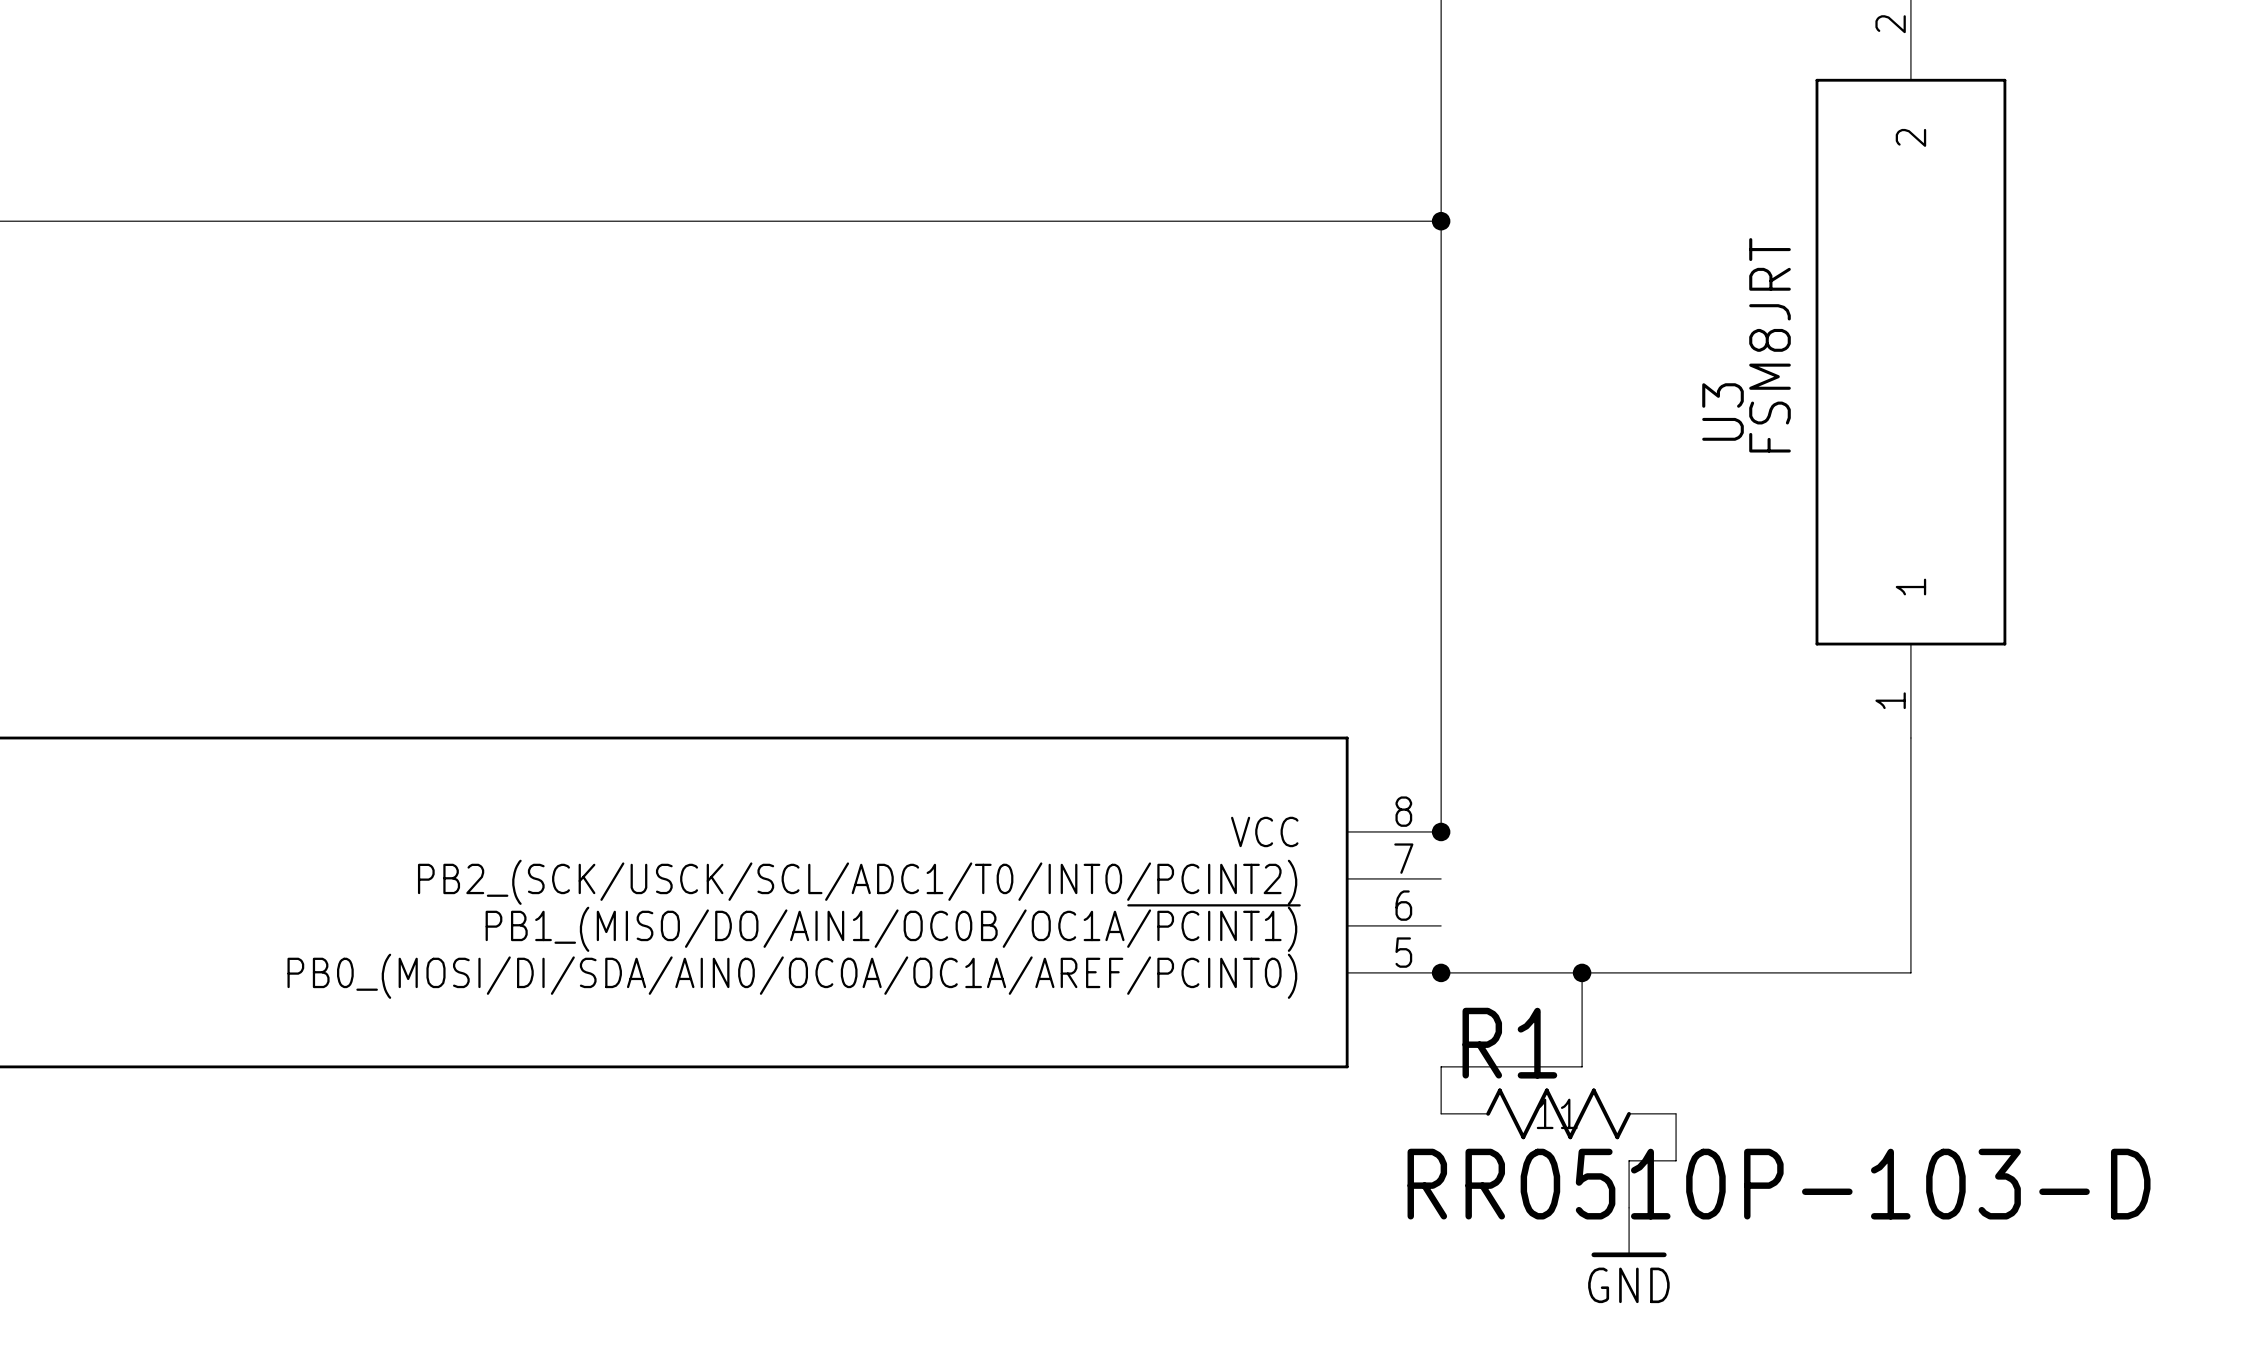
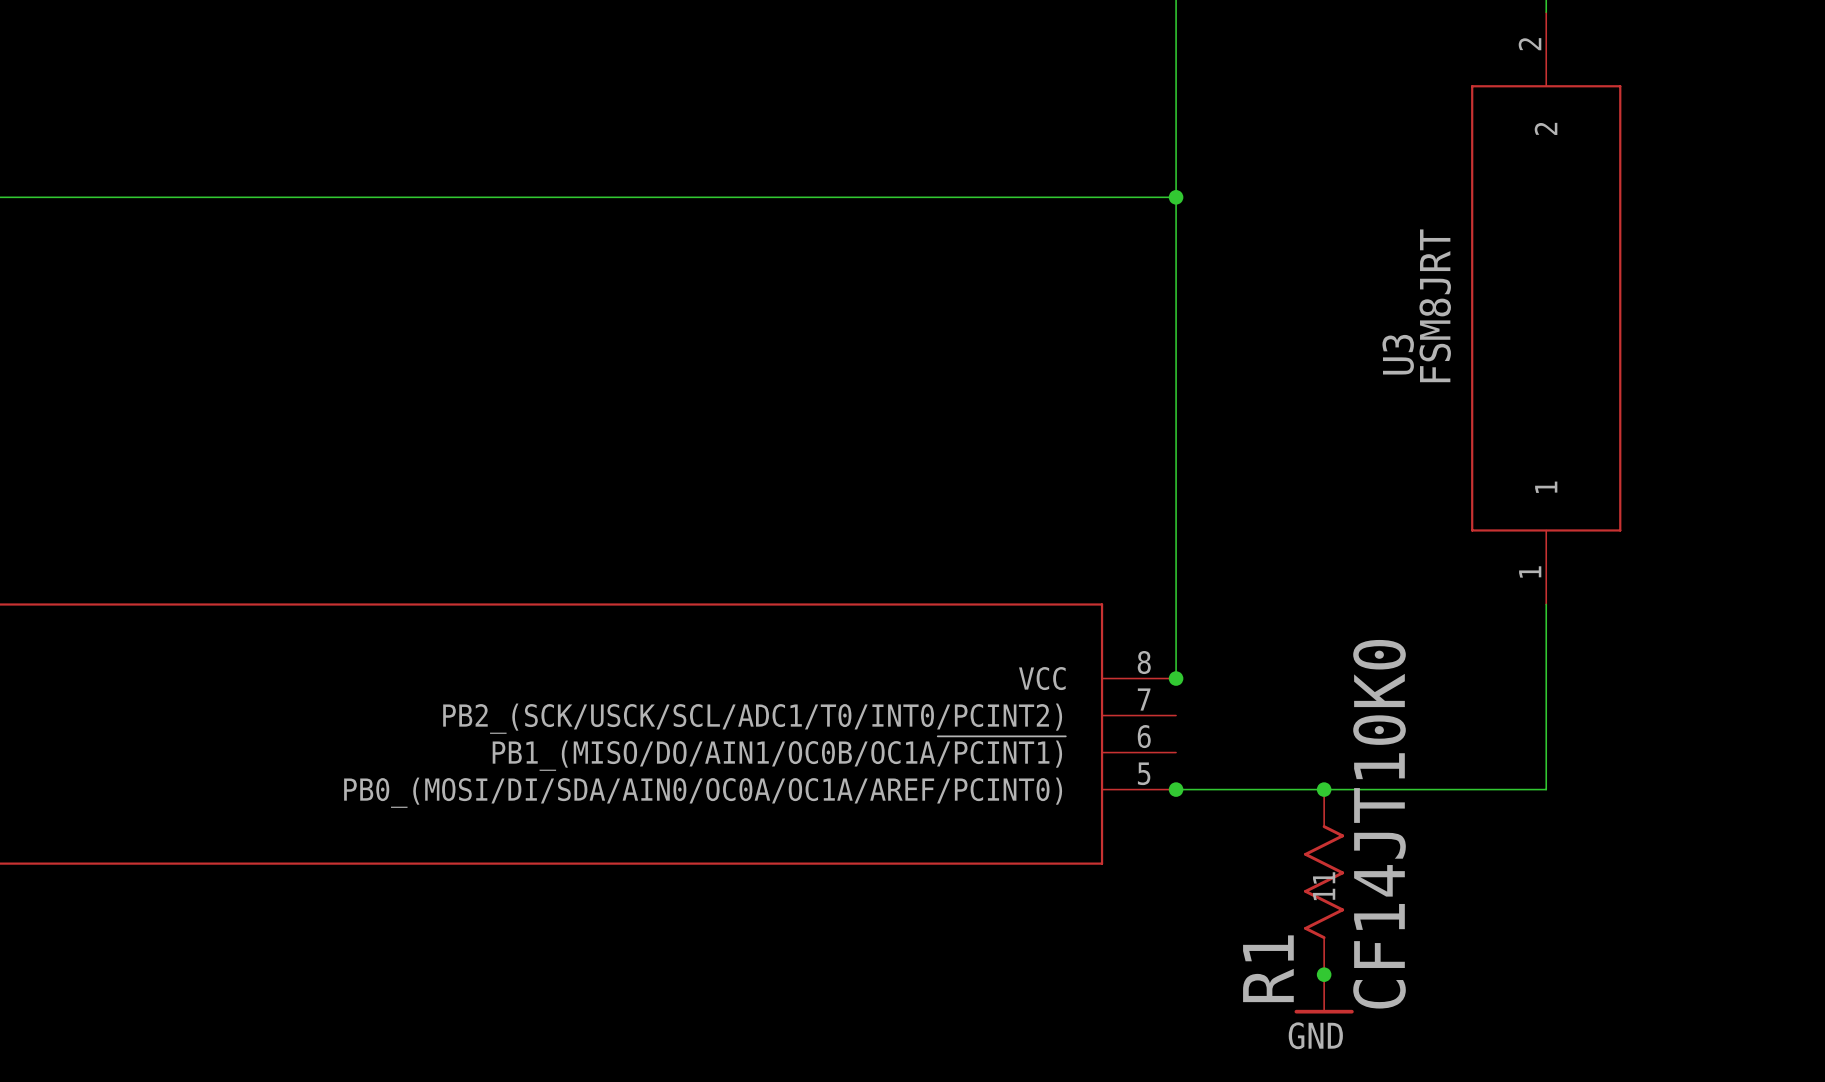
wire: (1582, 972) (1582, 1066) (1441, 1066) (1441, 1113) -> none
junction position: (1582, 972) -> (1324, 789)
R1 name position: R1 (1509, 1043) -> R1 (1268, 968)
R1 rotation: 0° (1558, 1113) -> 90° counterclockwise (1324, 882)
wire: (1676, 1113) (1676, 1160) (1629, 1160) (1629, 1207) -> none
R1 value: RR0510P-103-D (1779, 1184) -> CF14JT10K0 (1379, 824)
junction: none -> (1324, 974)

